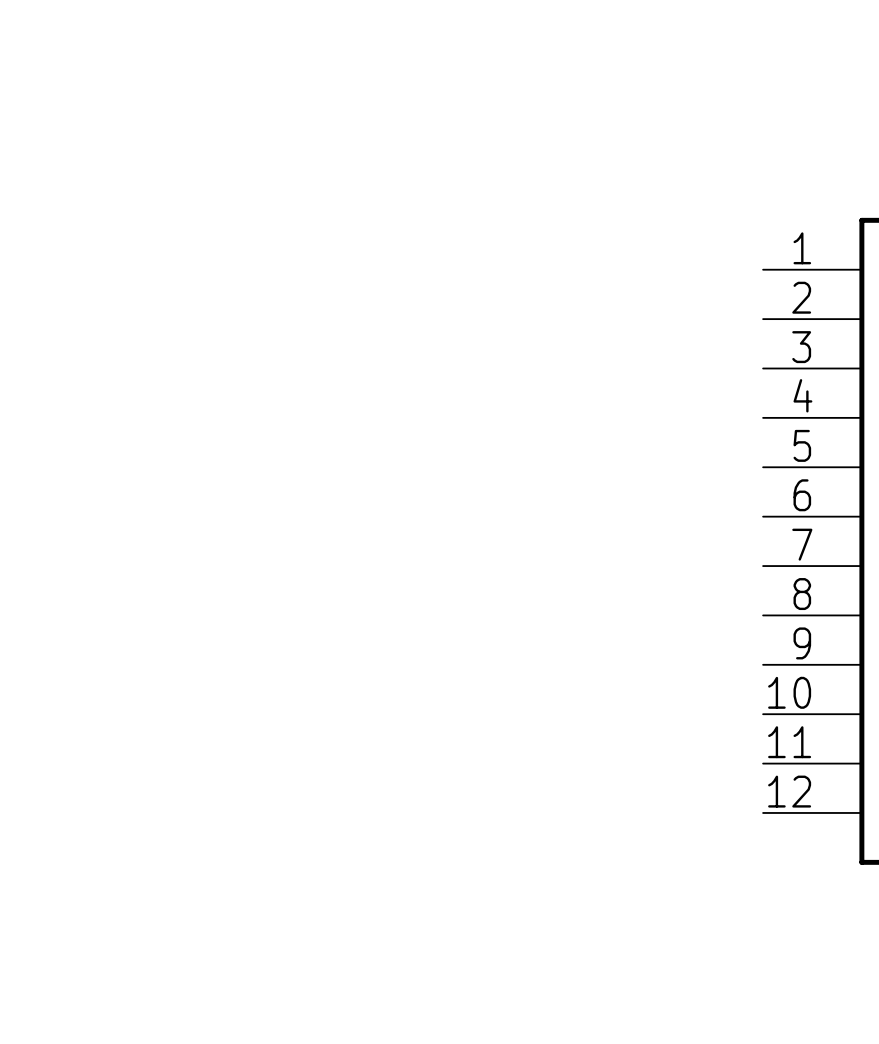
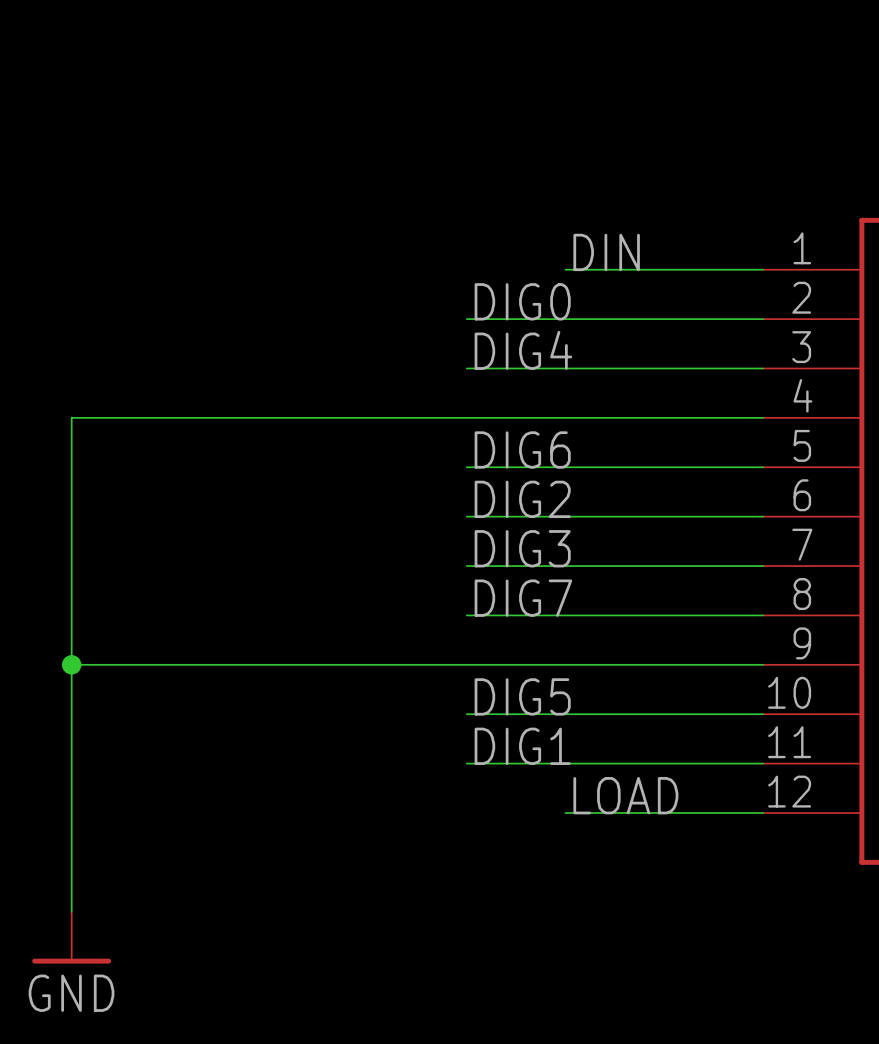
label: none -> DIN (606, 252)
wire: none -> (565, 269) (763, 269)
label: none -> DIG0 (522, 301)
wire: none -> (466, 319) (763, 319)
label: none -> DIG4 (523, 350)
wire: none -> (466, 368) (763, 368)
wire: none -> (763, 417) (71, 417) (71, 911)
label: none -> DIG6 (522, 449)
wire: none -> (466, 467) (763, 467)
label: none -> DIG2 (522, 499)
wire: none -> (466, 516) (763, 516)
label: none -> DIG3 (522, 548)
wire: none -> (466, 566) (763, 566)
label: none -> DIG7 (523, 598)
wire: none -> (466, 615) (763, 615)
wire: none -> (71, 664) (763, 664)
junction: none -> (71, 664)
label: none -> DIG5 (522, 696)
wire: none -> (466, 714) (763, 714)
label: none -> DIG1 (522, 746)
wire: none -> (466, 763) (763, 763)
label: none -> LOAD (625, 795)
wire: none -> (565, 812) (763, 812)
power symbol: none -> GND (71, 937)

